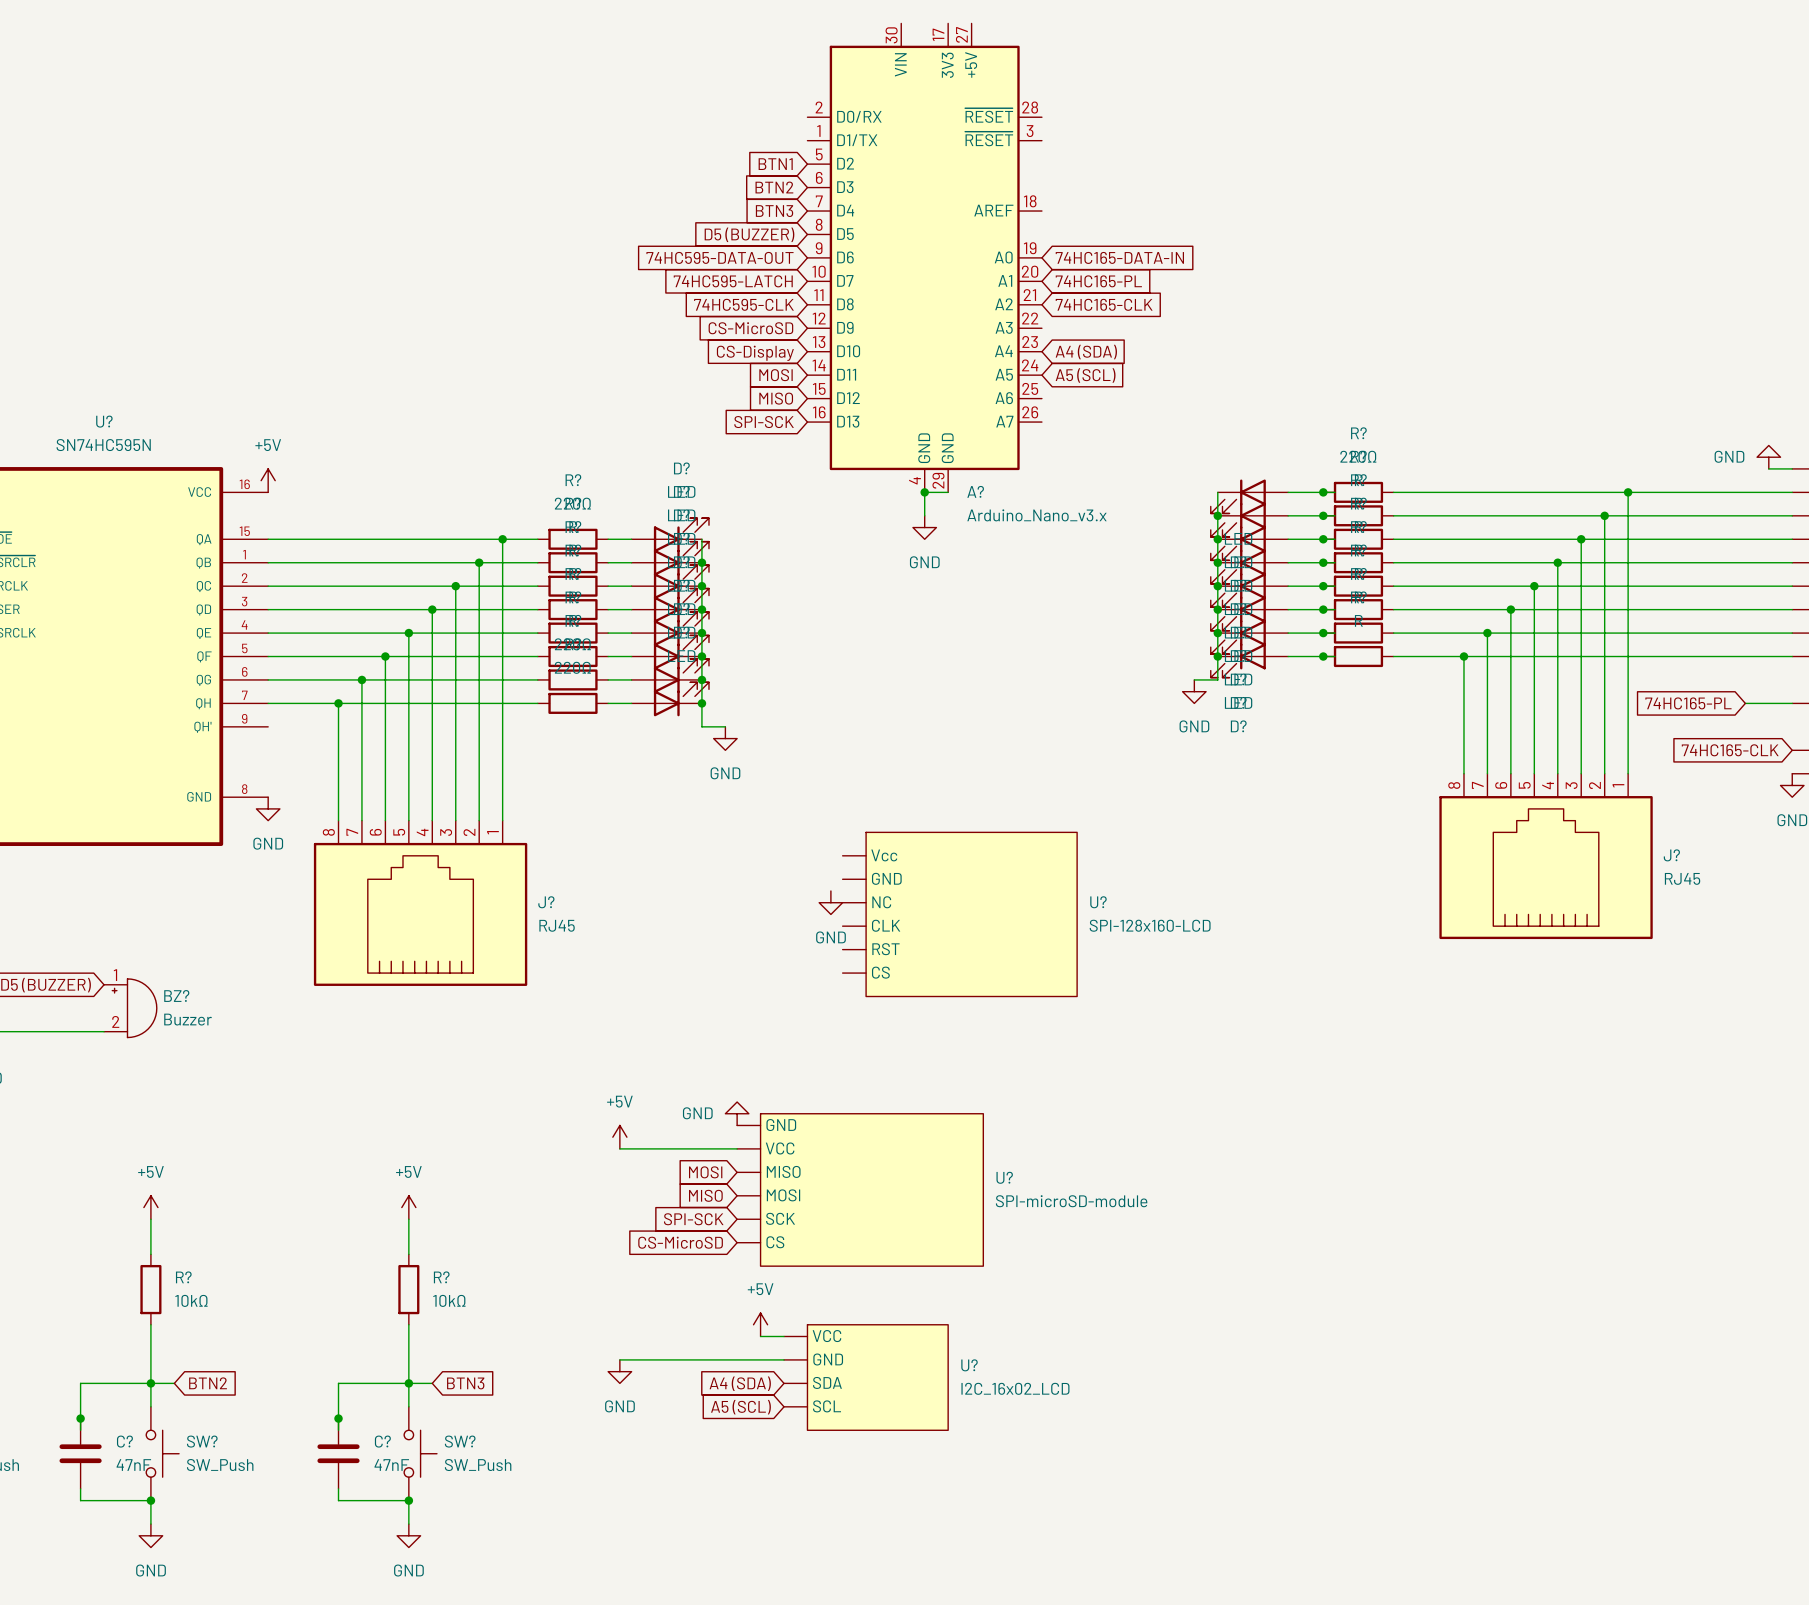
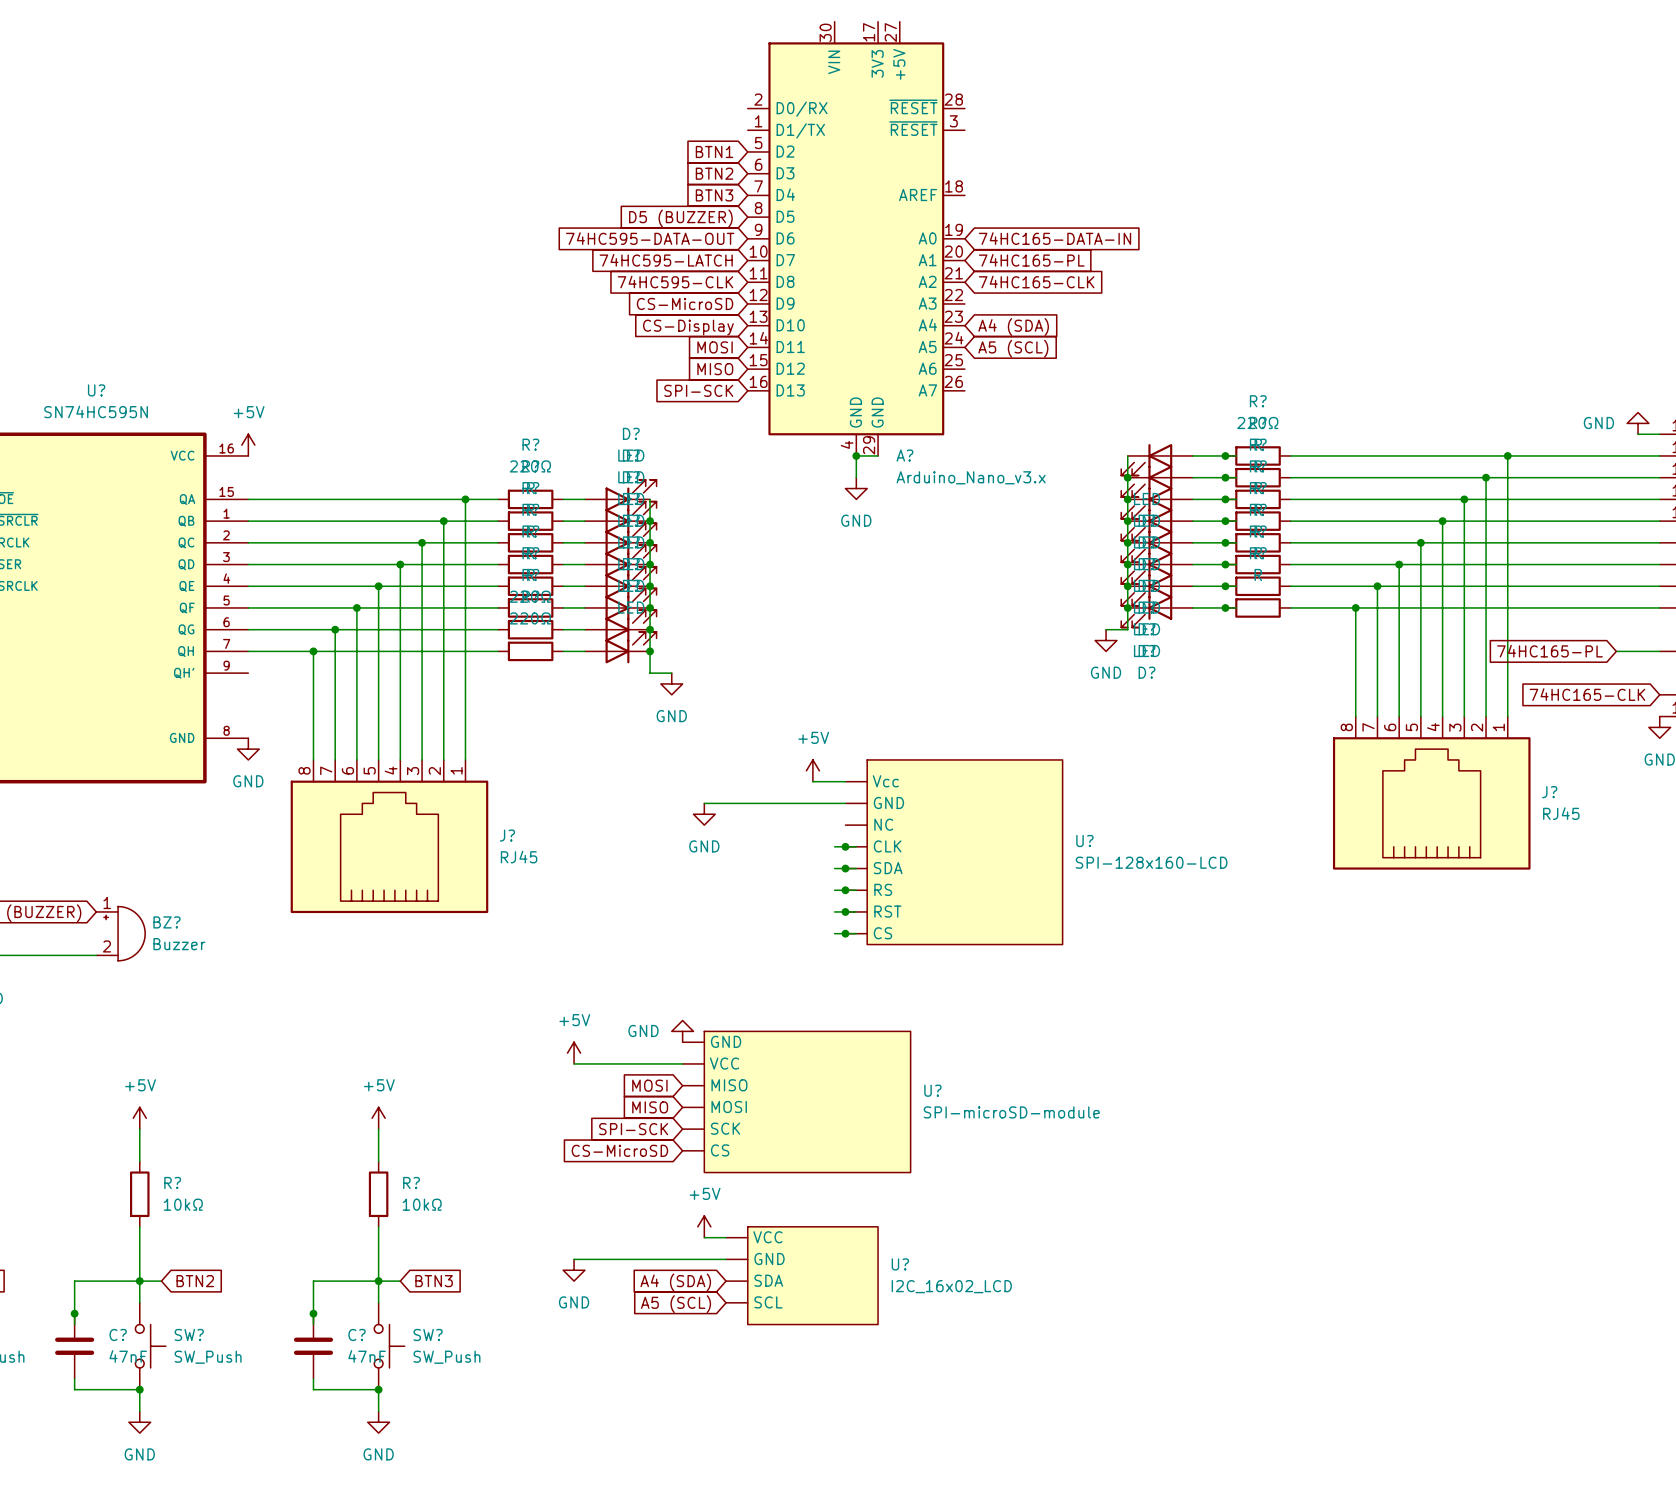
power symbol: none -> +5V (812, 770)
wire: none -> (704, 803) (845, 803)
power symbol position: GND (830, 902) -> GND (704, 814)
junction: none -> (845, 846)
U?: SPI-128x160-LCD (959, 914) -> none
U?: none -> SPI-128x160-LCD (954, 852)
junction: none -> (845, 868)
junction: none -> (845, 890)
junction: none -> (845, 911)
wire: none -> (834, 933) (856, 933)
junction: none -> (845, 933)

